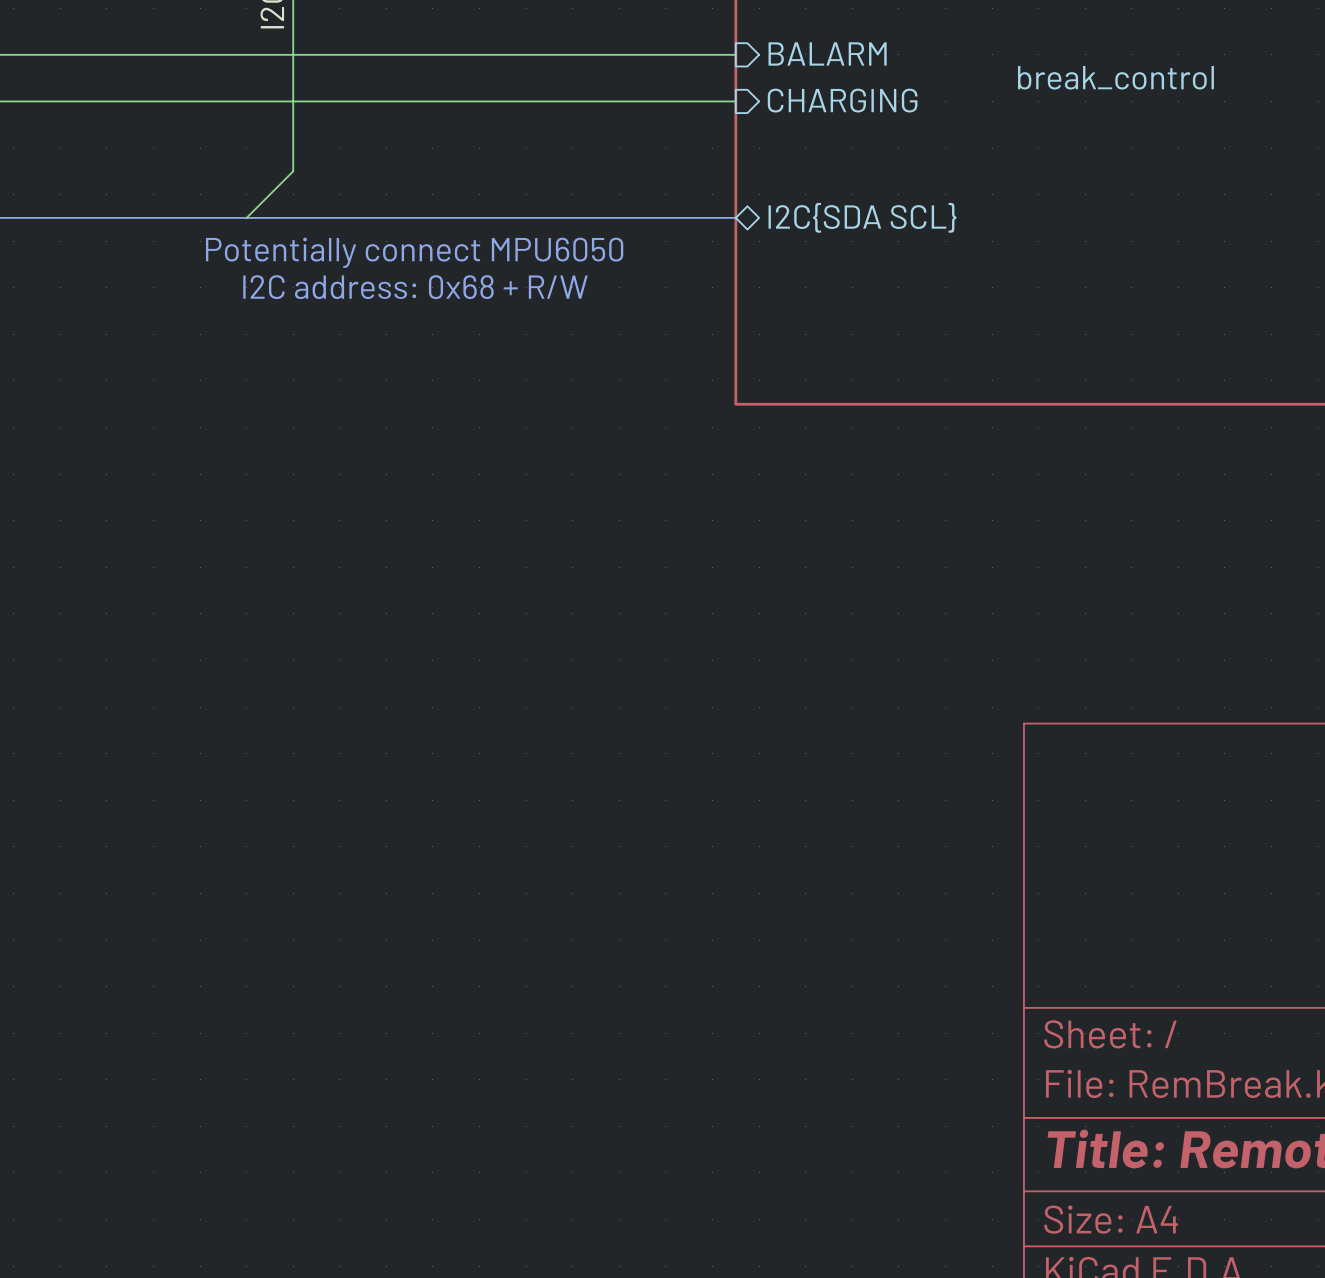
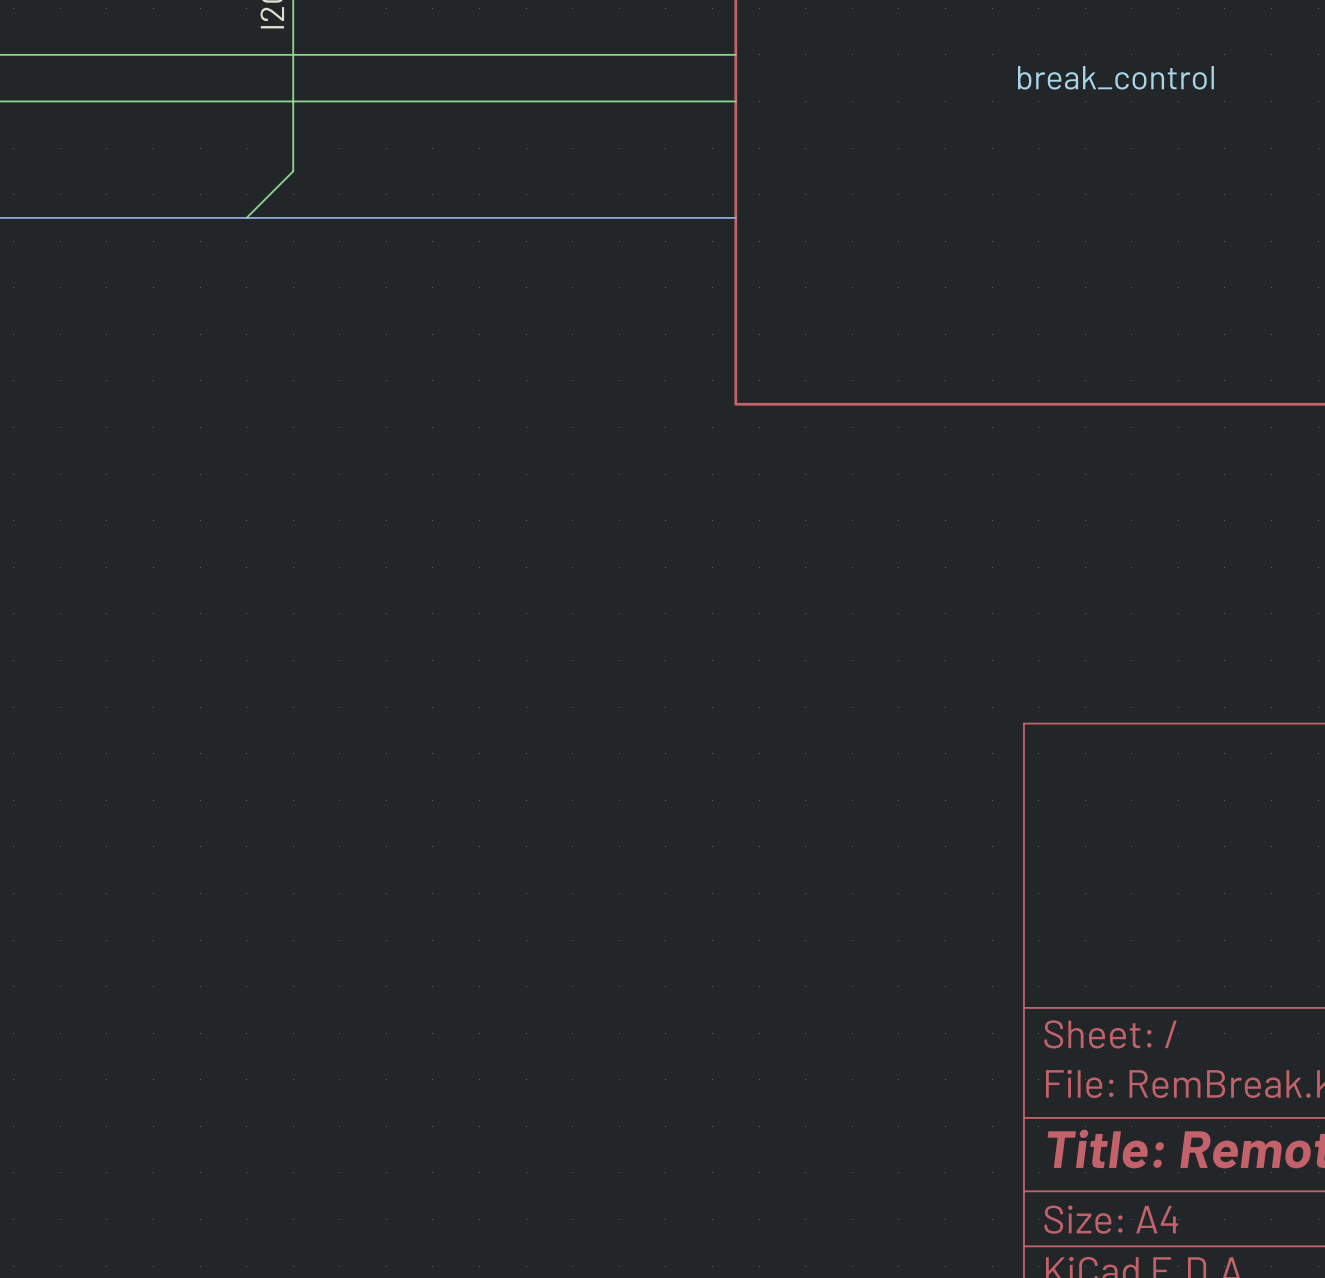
sheet pin: BALARM (827, 53) -> none
sheet pin: CHARGING (842, 100) -> none
sheet pin: I2C{SDA SCL} (862, 217) -> none
text: Potentially connect MPU6050 (414, 252) -> none
text: I2C address: 0x68 + R/W (415, 287) -> none

